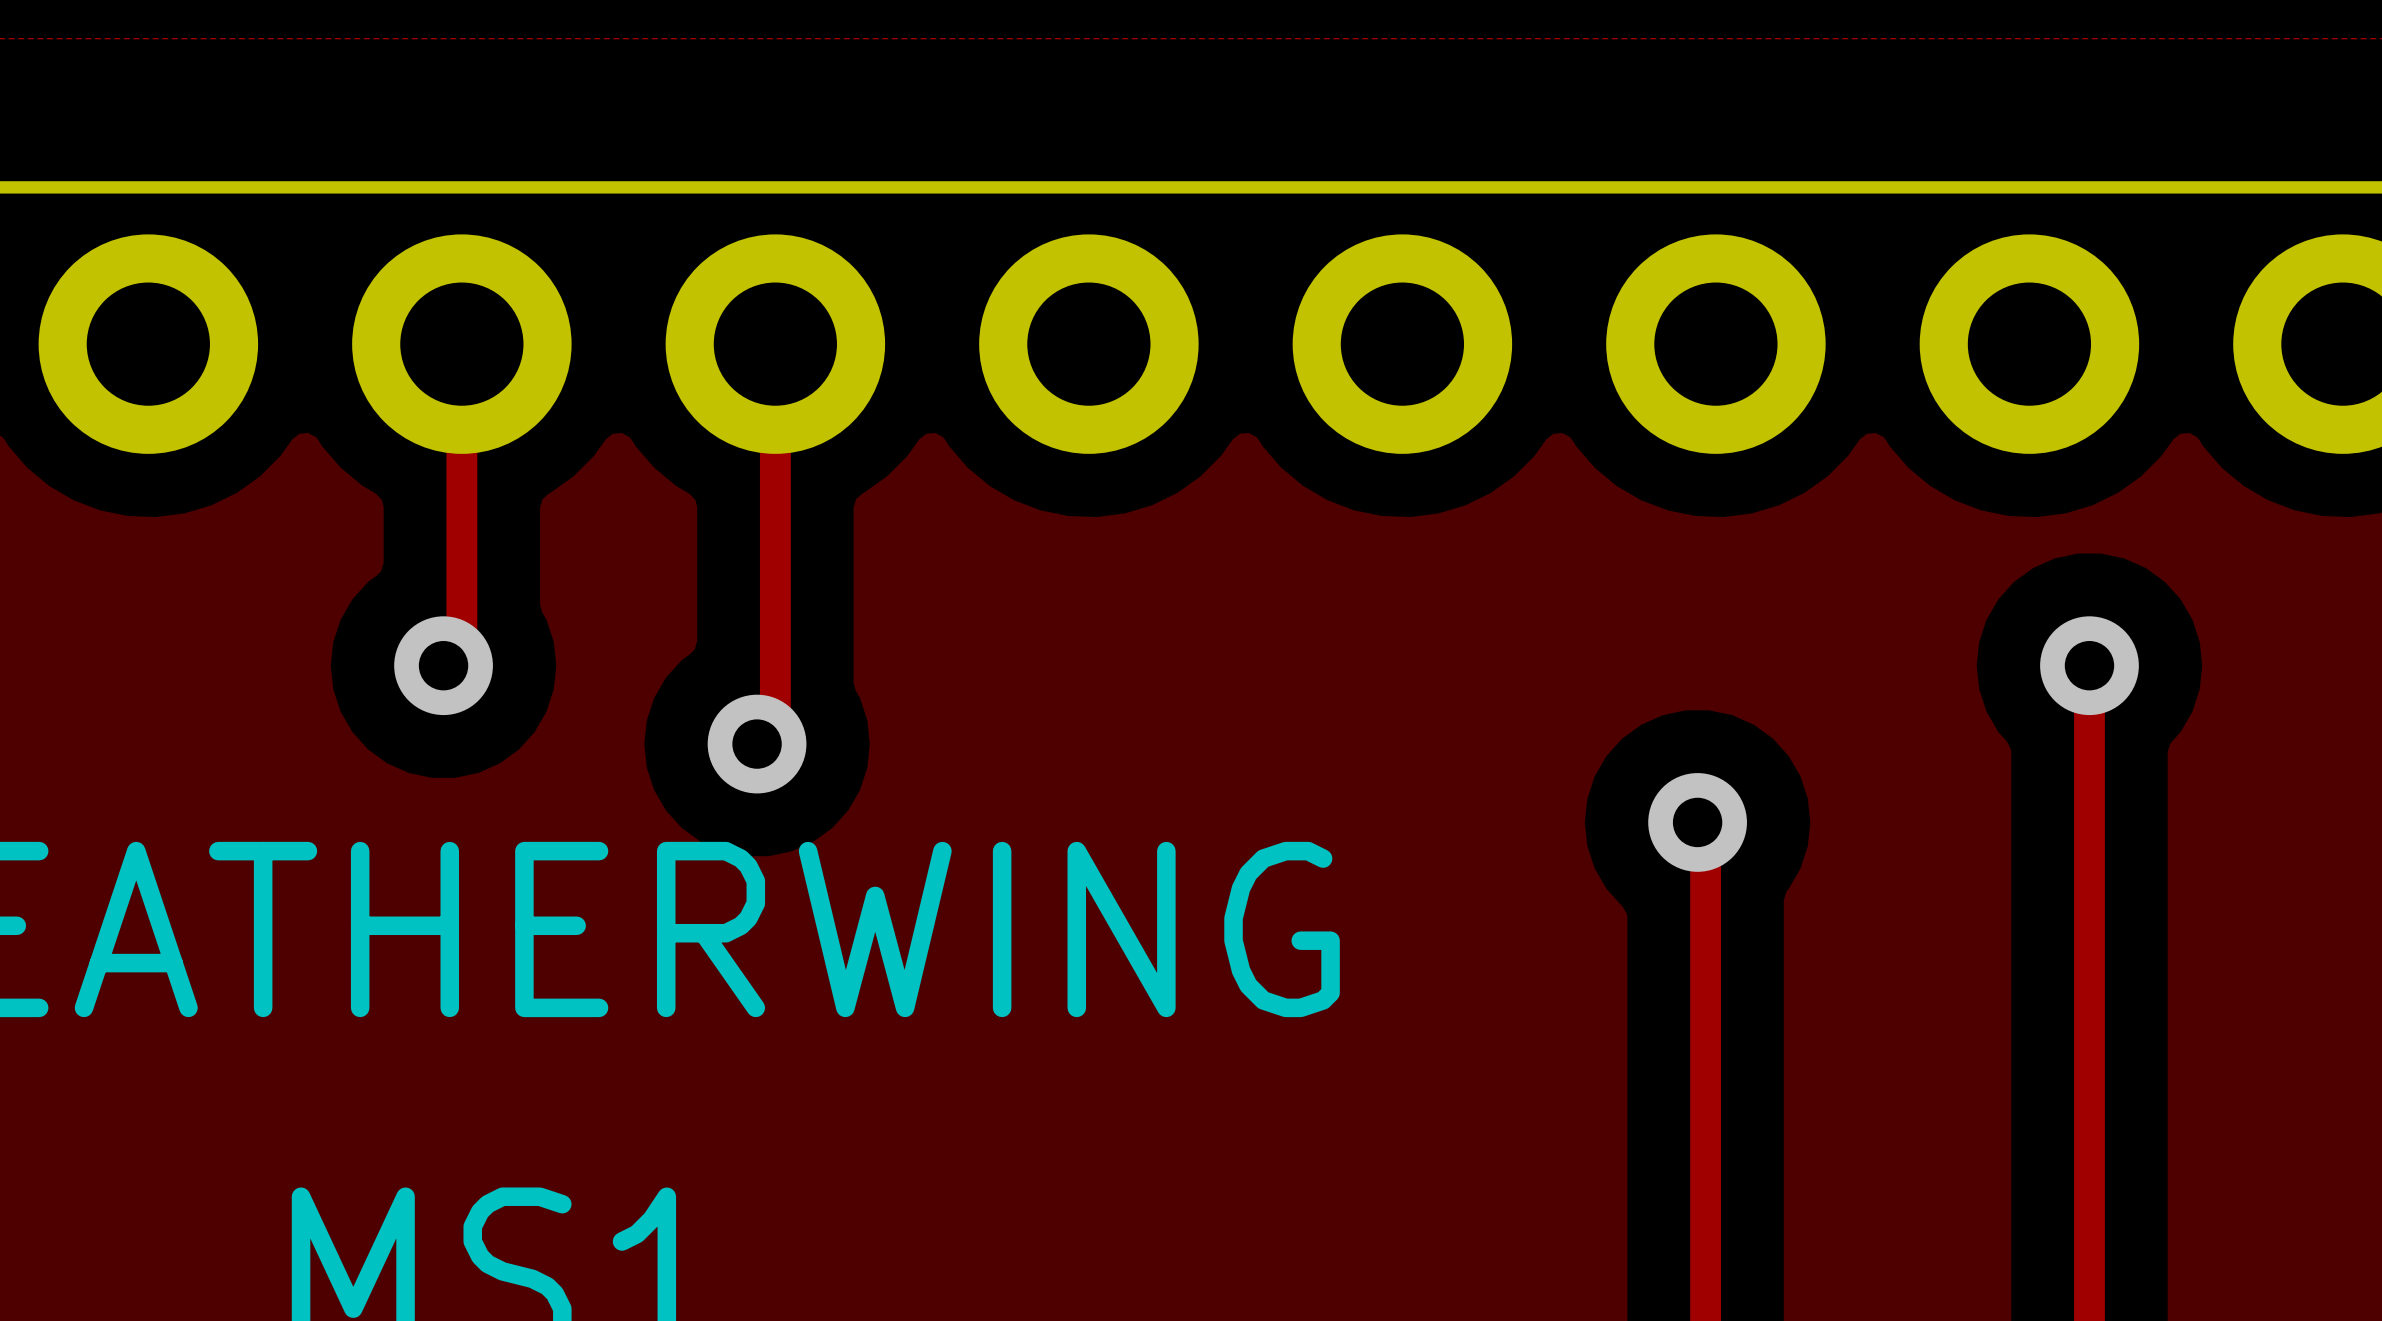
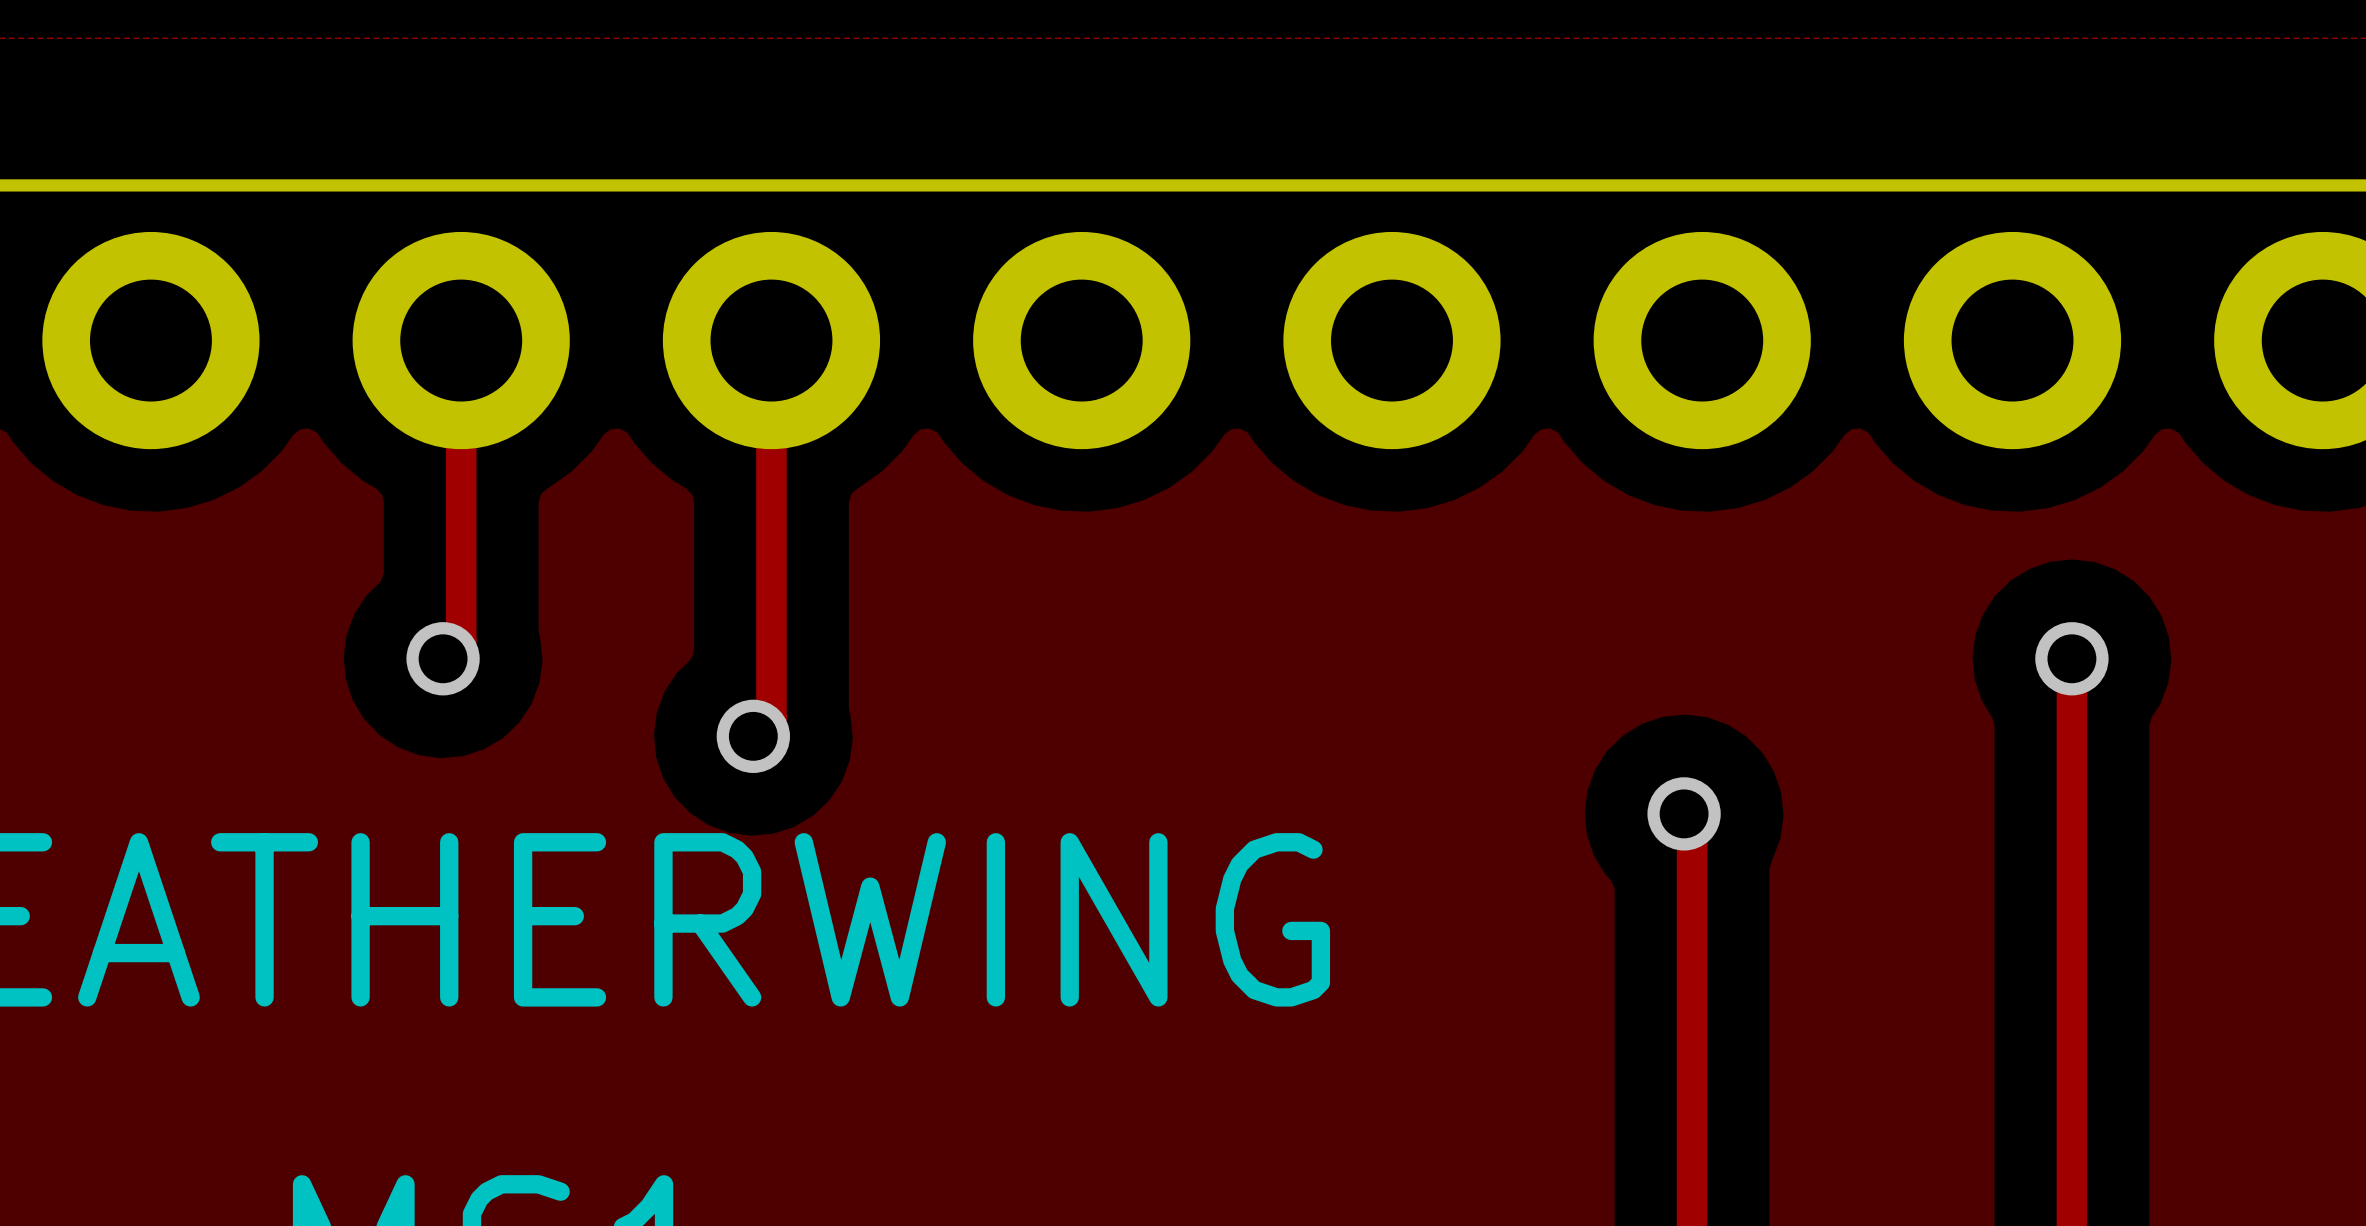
via size: [394, 616, 493, 716] -> [406, 622, 480, 696]
via size: [2040, 616, 2139, 716] -> [2035, 622, 2109, 696]
via size: [707, 694, 807, 794] -> [716, 699, 790, 773]
via size: [1648, 773, 1747, 872] -> [1647, 777, 1721, 851]

